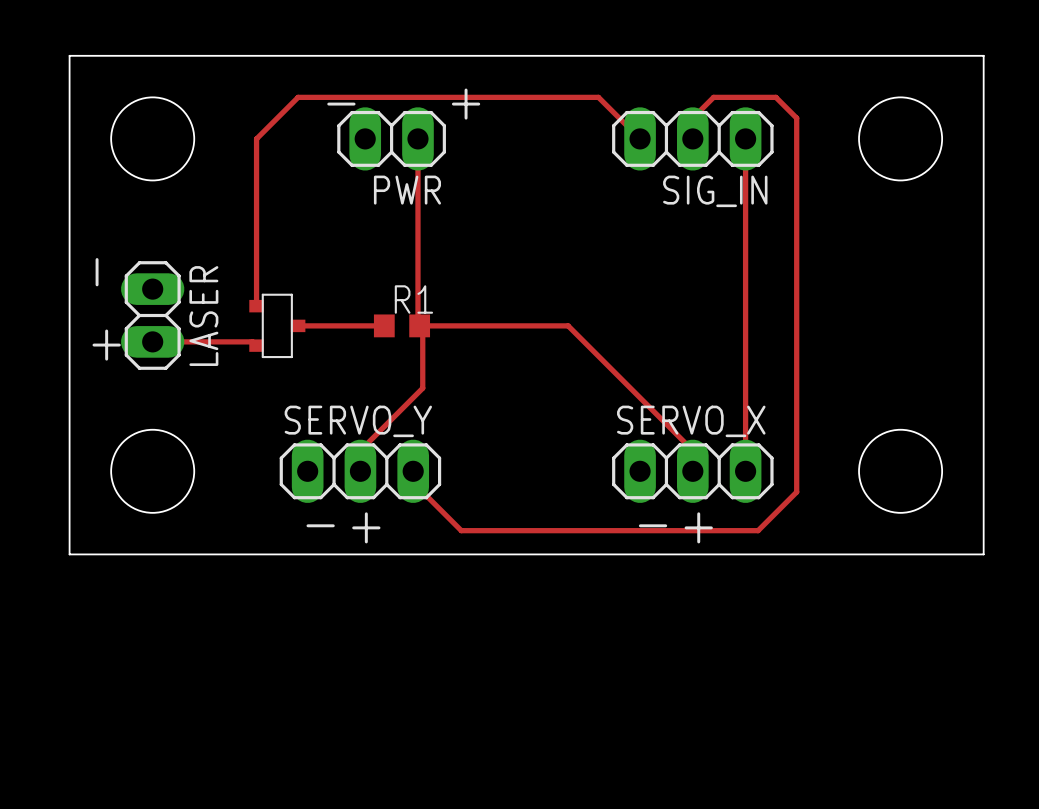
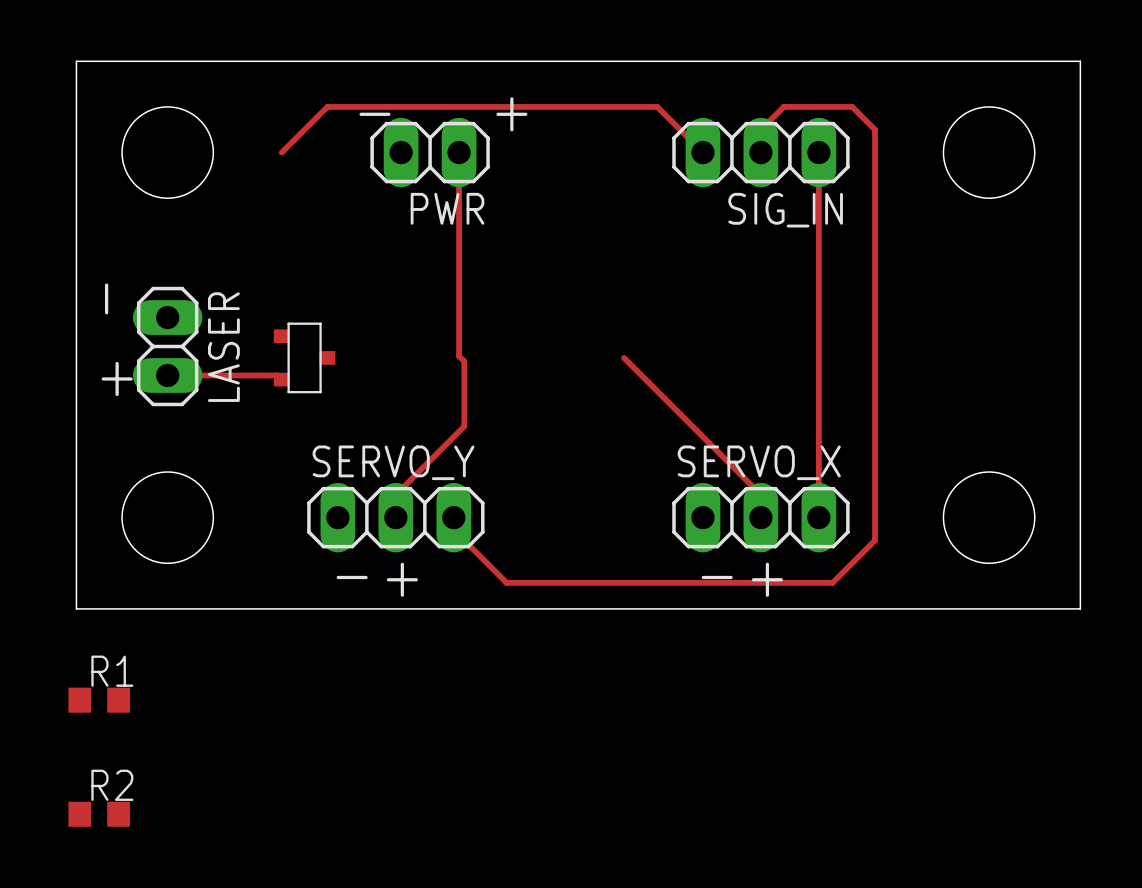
top track: (256, 138) (256, 306) -> none
top track: (298, 325) (384, 325) -> none
R1 position: (401, 325) -> (99, 700)
top track: (419, 325) (568, 325) -> none
R2: none -> (99, 814)

